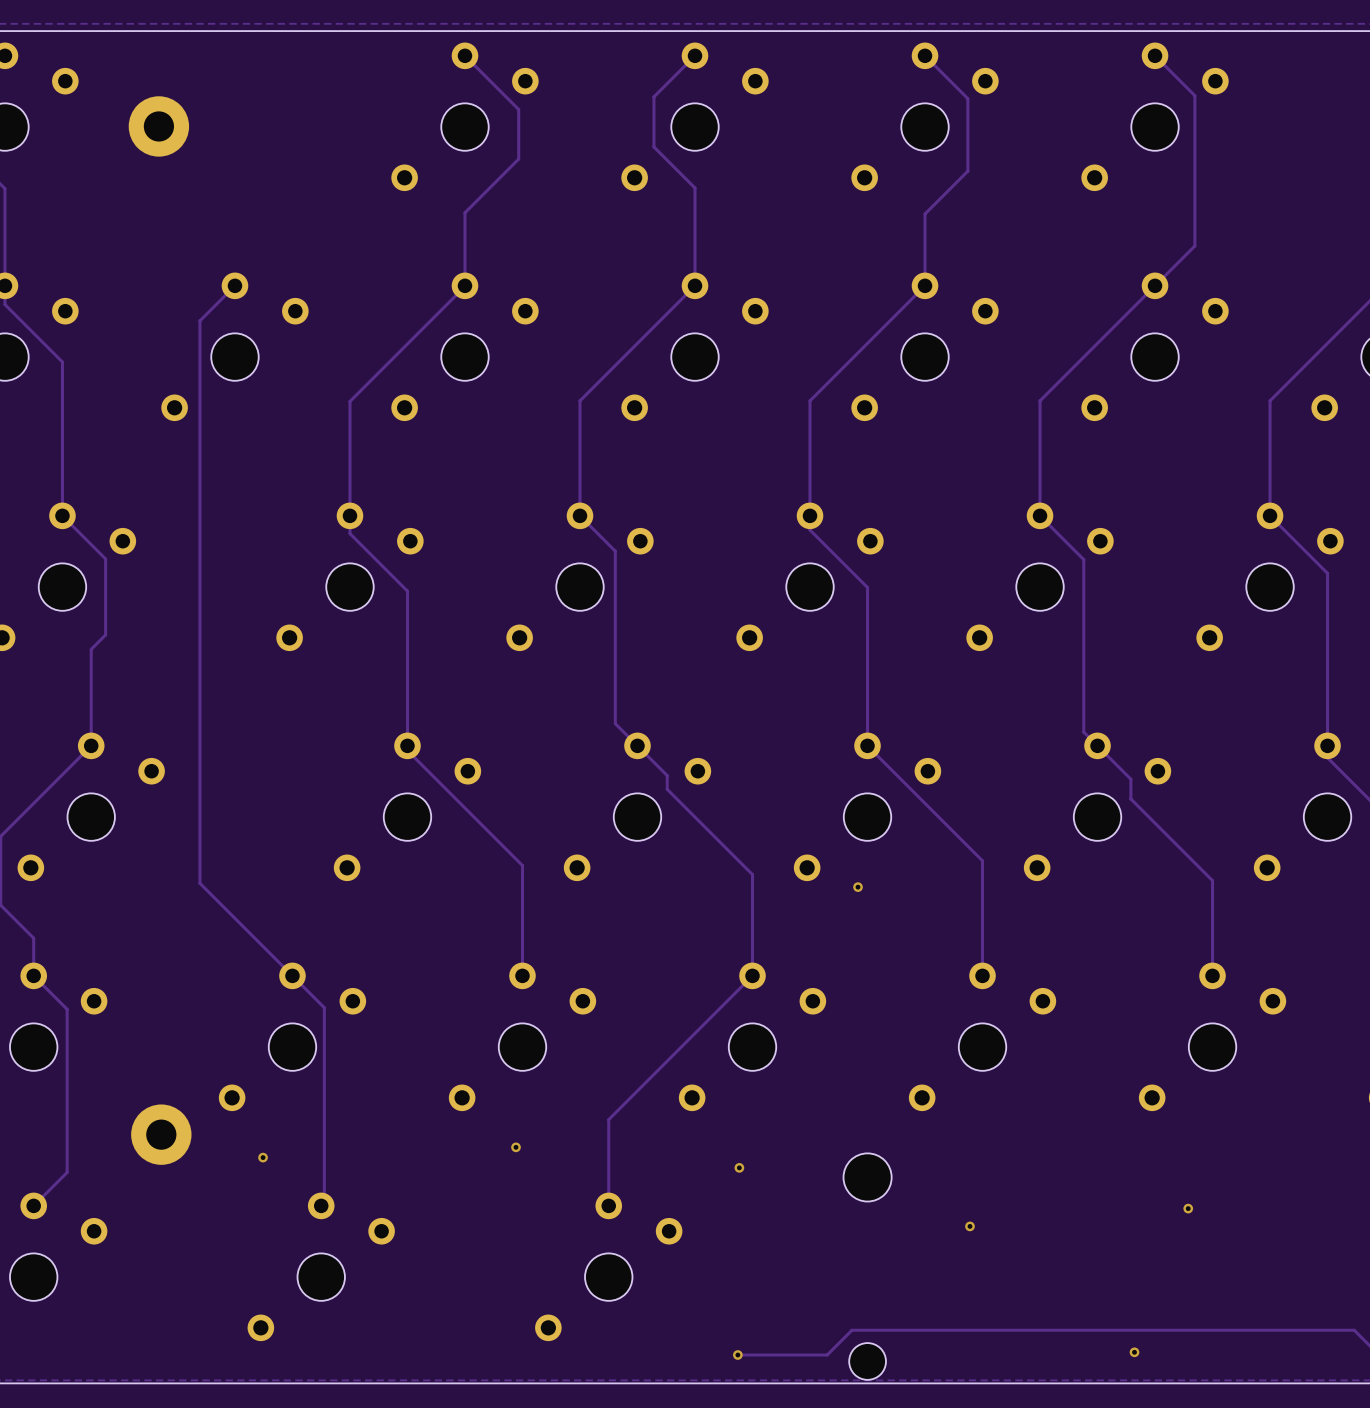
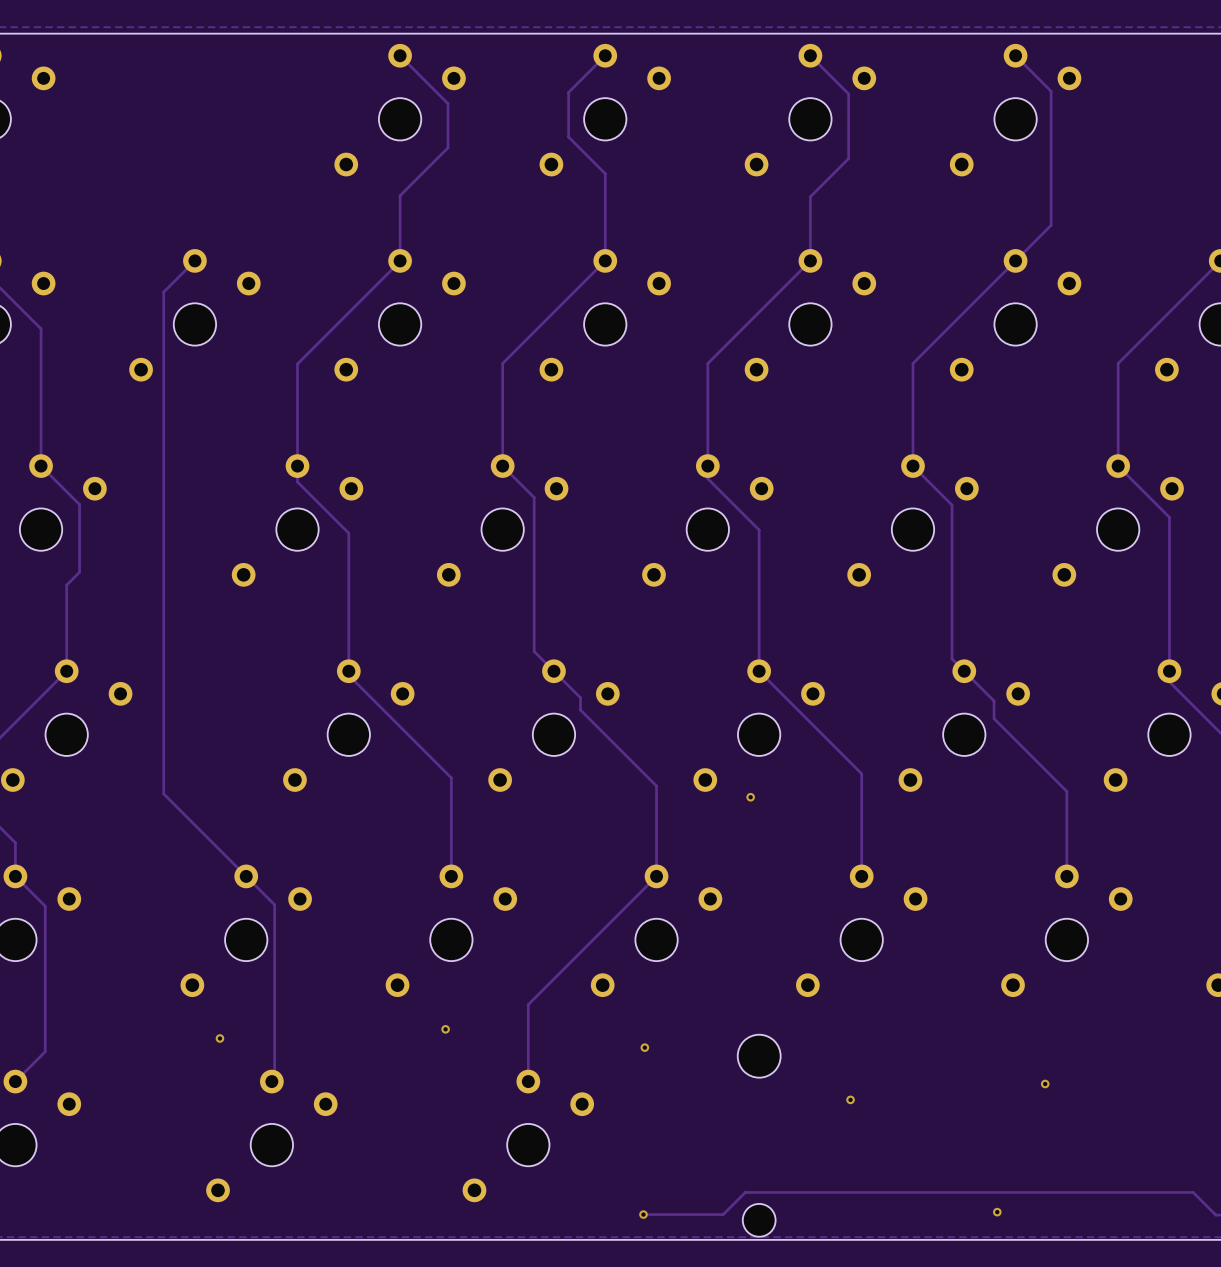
part: (158, 126) -> none
part: (161, 1134) -> none

